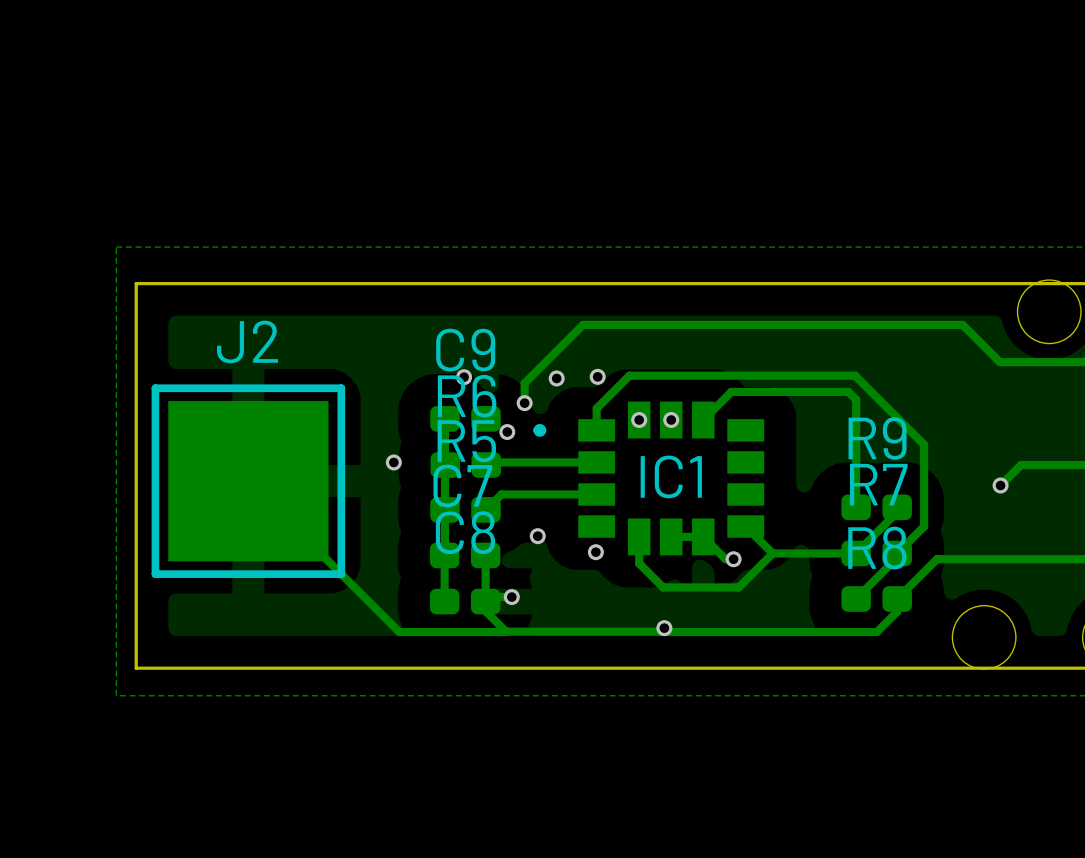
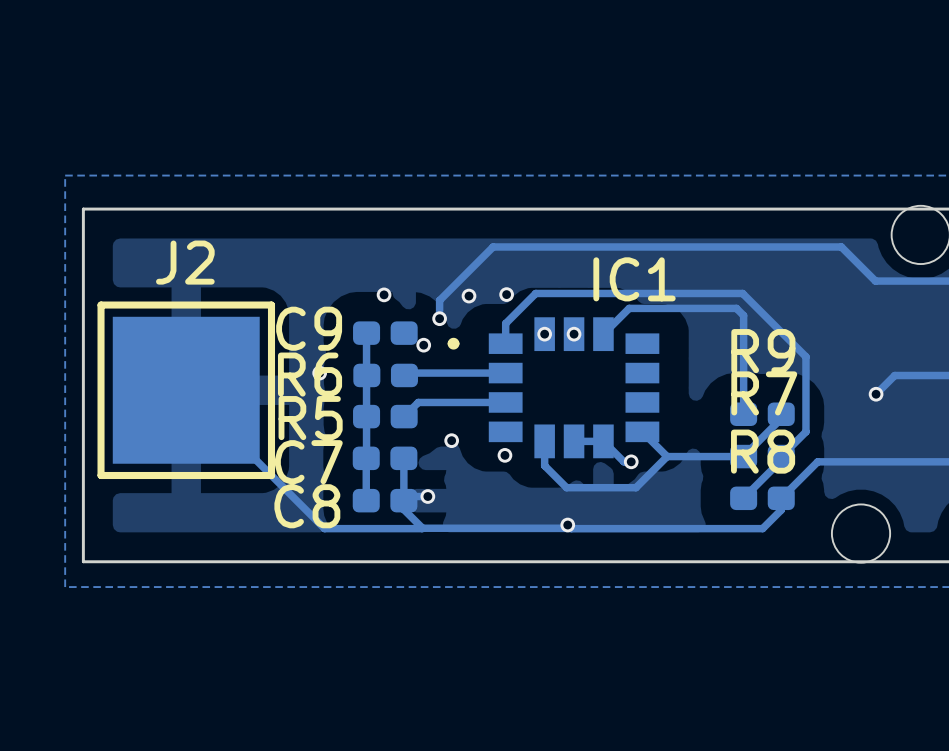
C9 name position: C9 (465, 350) -> C9 (309, 328)
R6 name position: R6 (467, 396) -> R6 (310, 374)
R5 name position: R5 (466, 441) -> R5 (310, 418)
IC1 name position: IC1 (671, 476) -> IC1 (634, 279)
C7 name position: C7 (462, 485) -> C7 (308, 462)
C8 name position: C8 (465, 532) -> C8 (307, 506)

